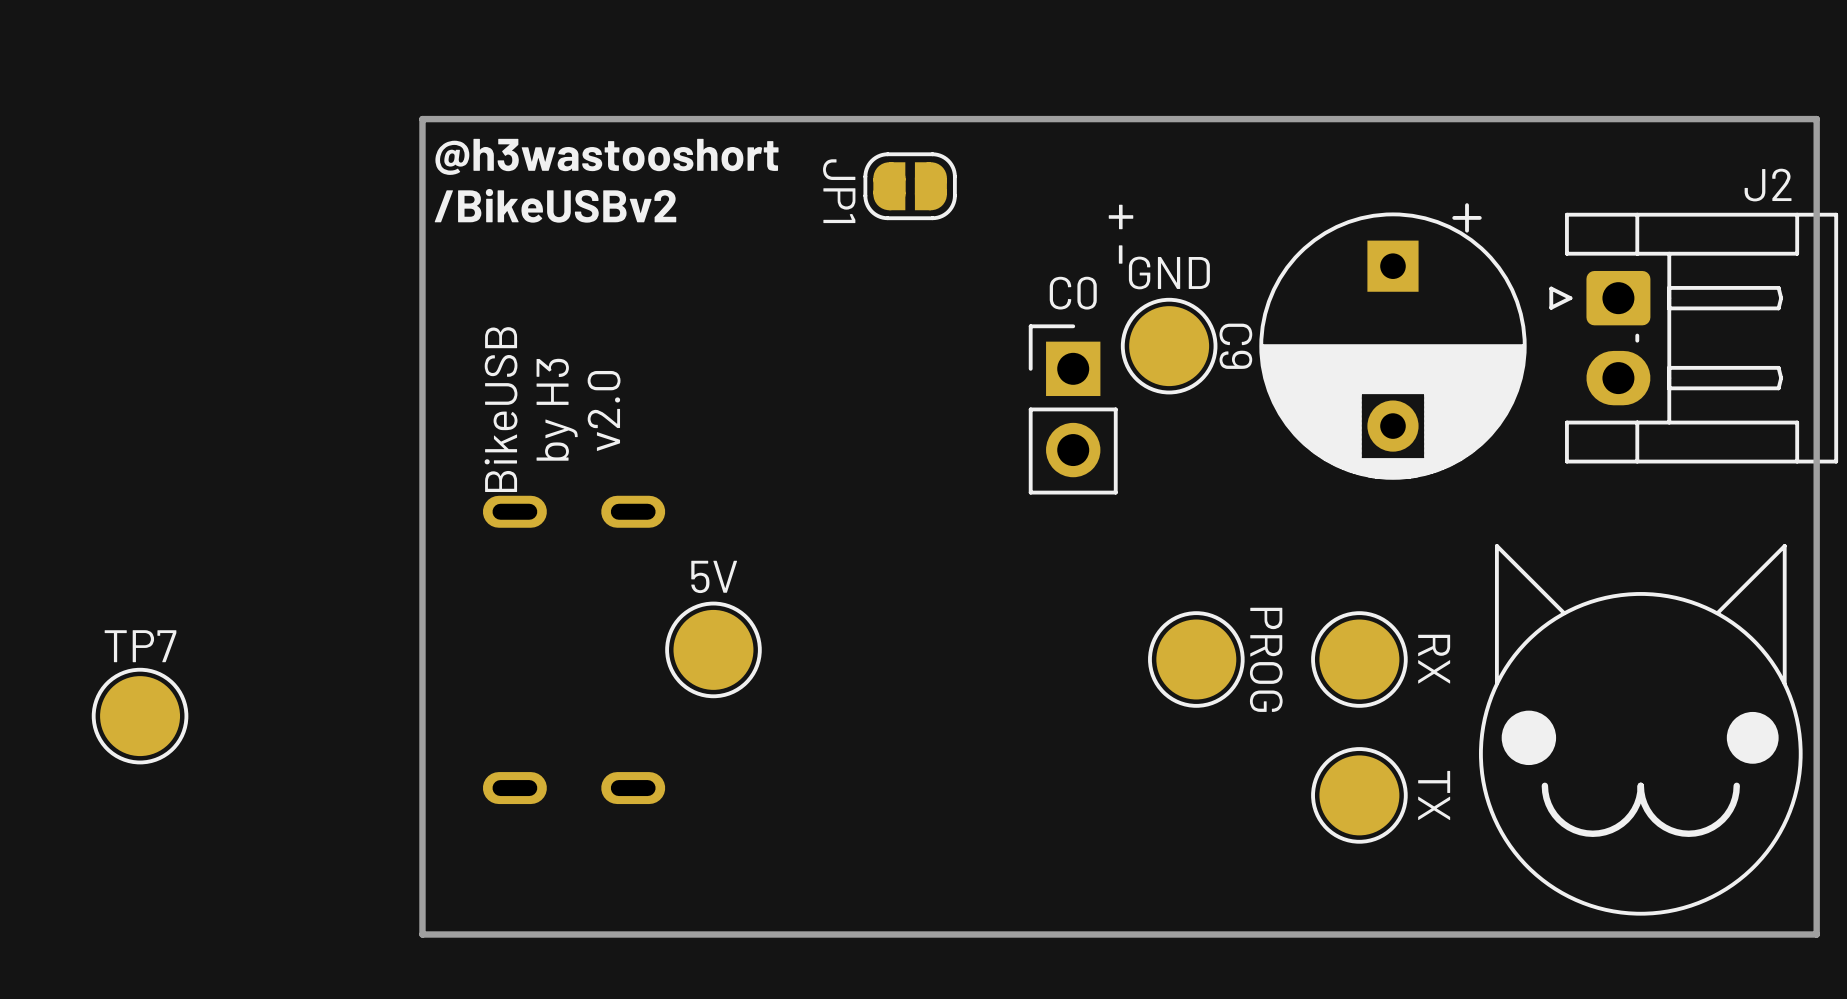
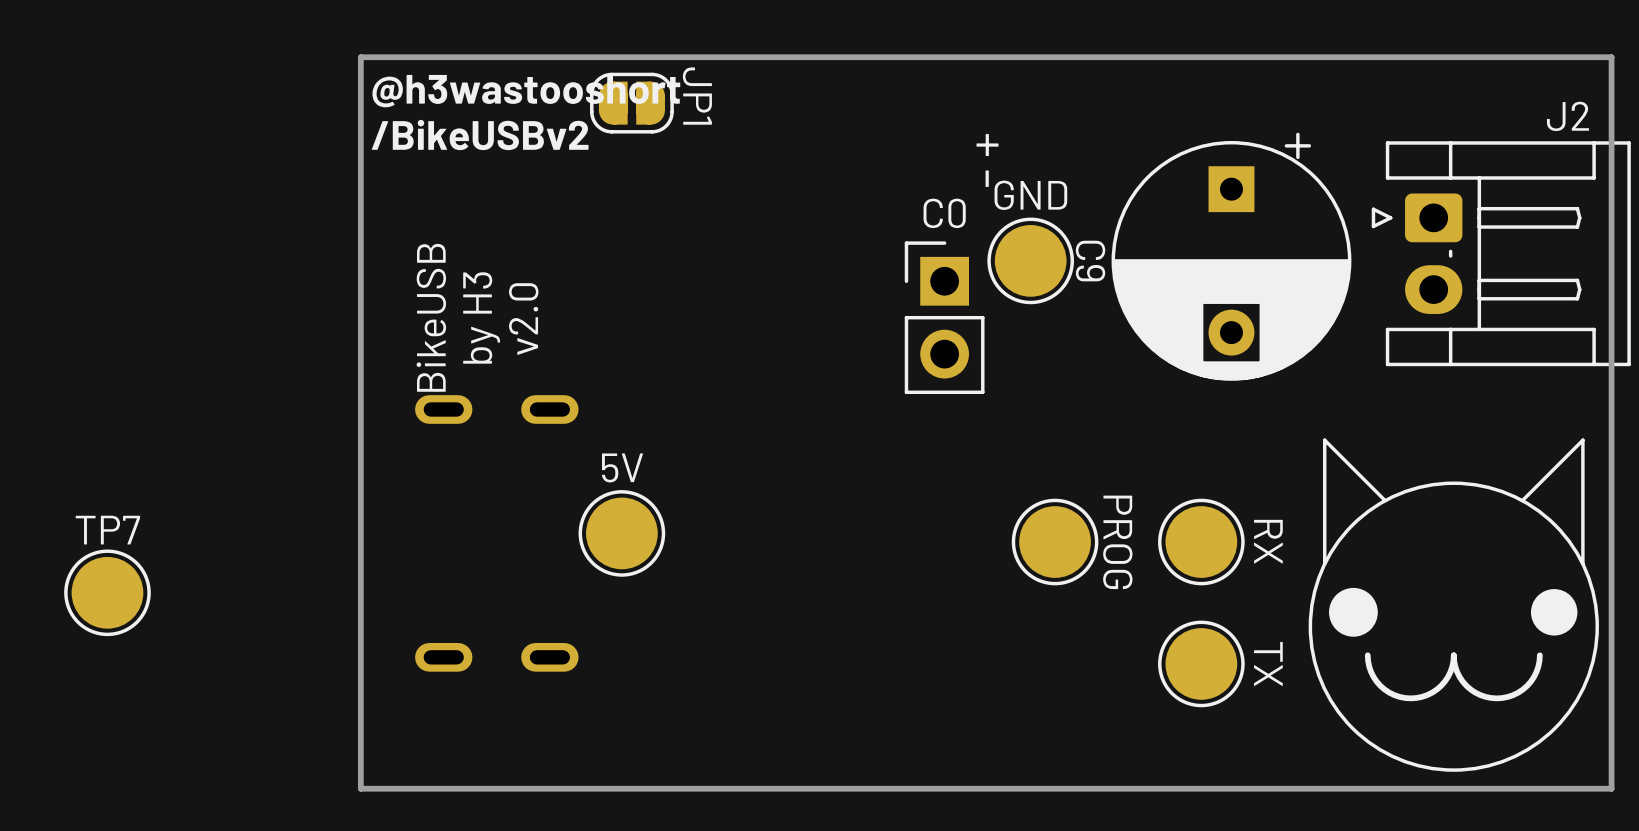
JP1 position: (910, 186) -> (631, 103)
JP1 name position: JP1 (839, 191) -> JP1 (697, 96)

